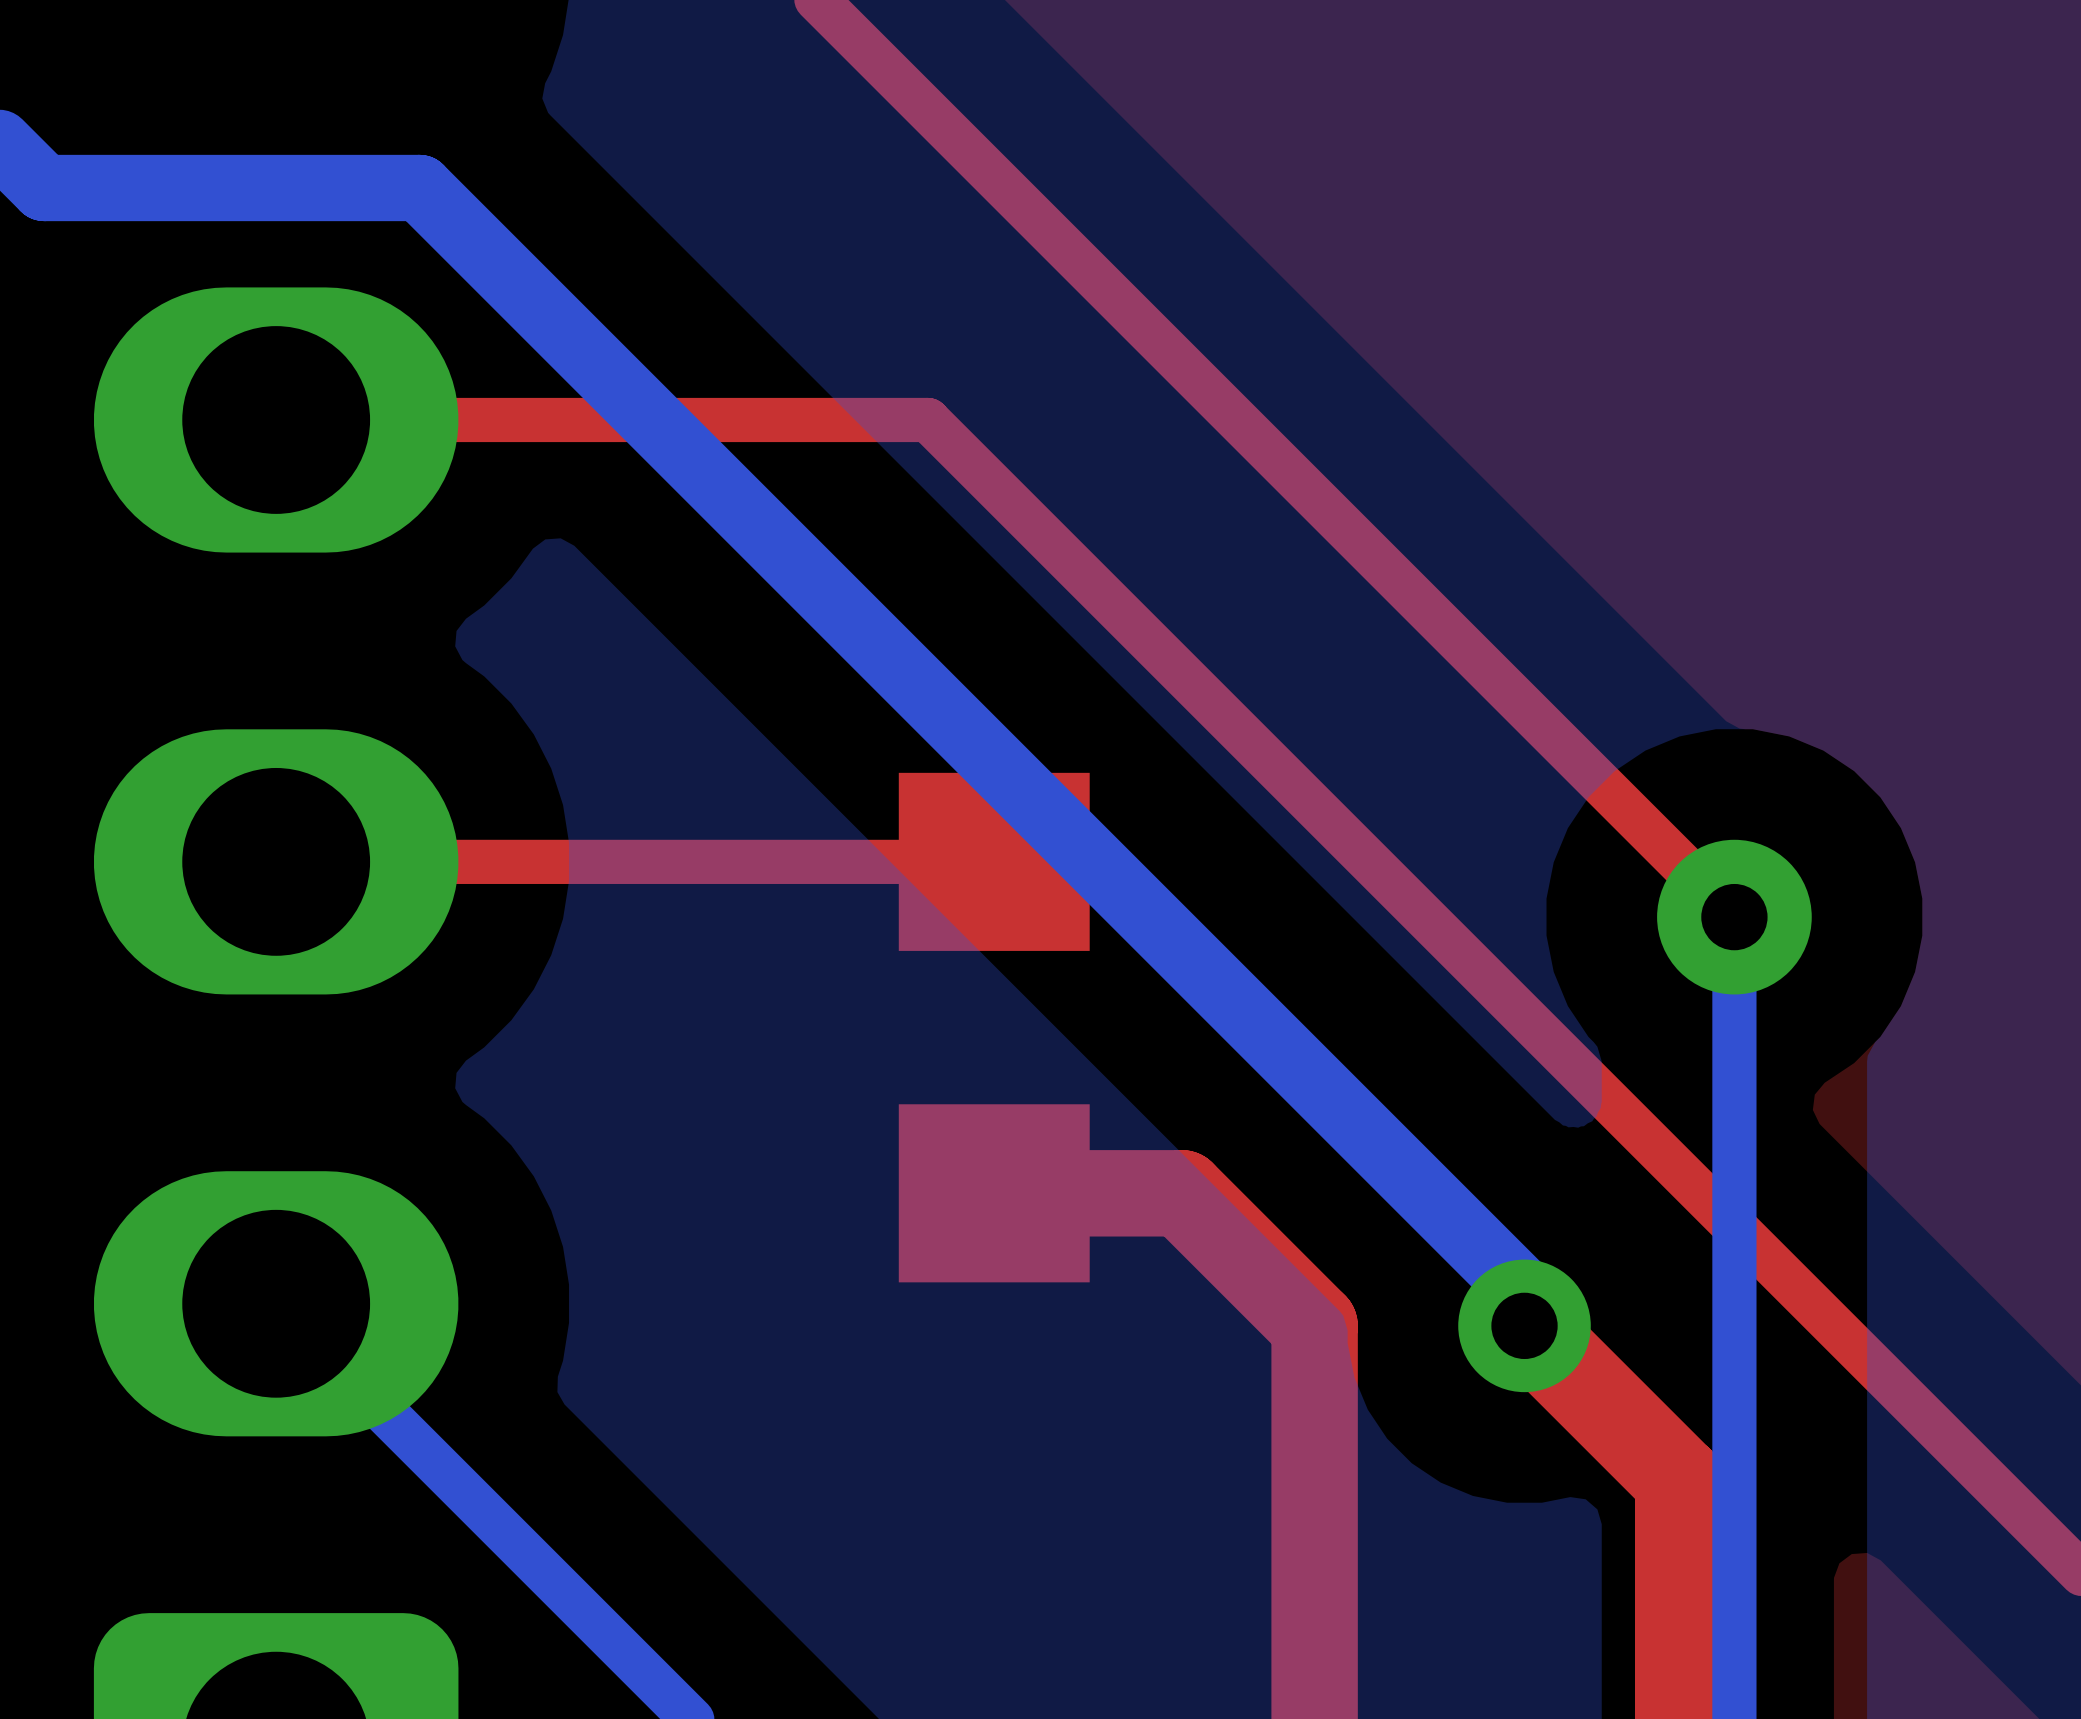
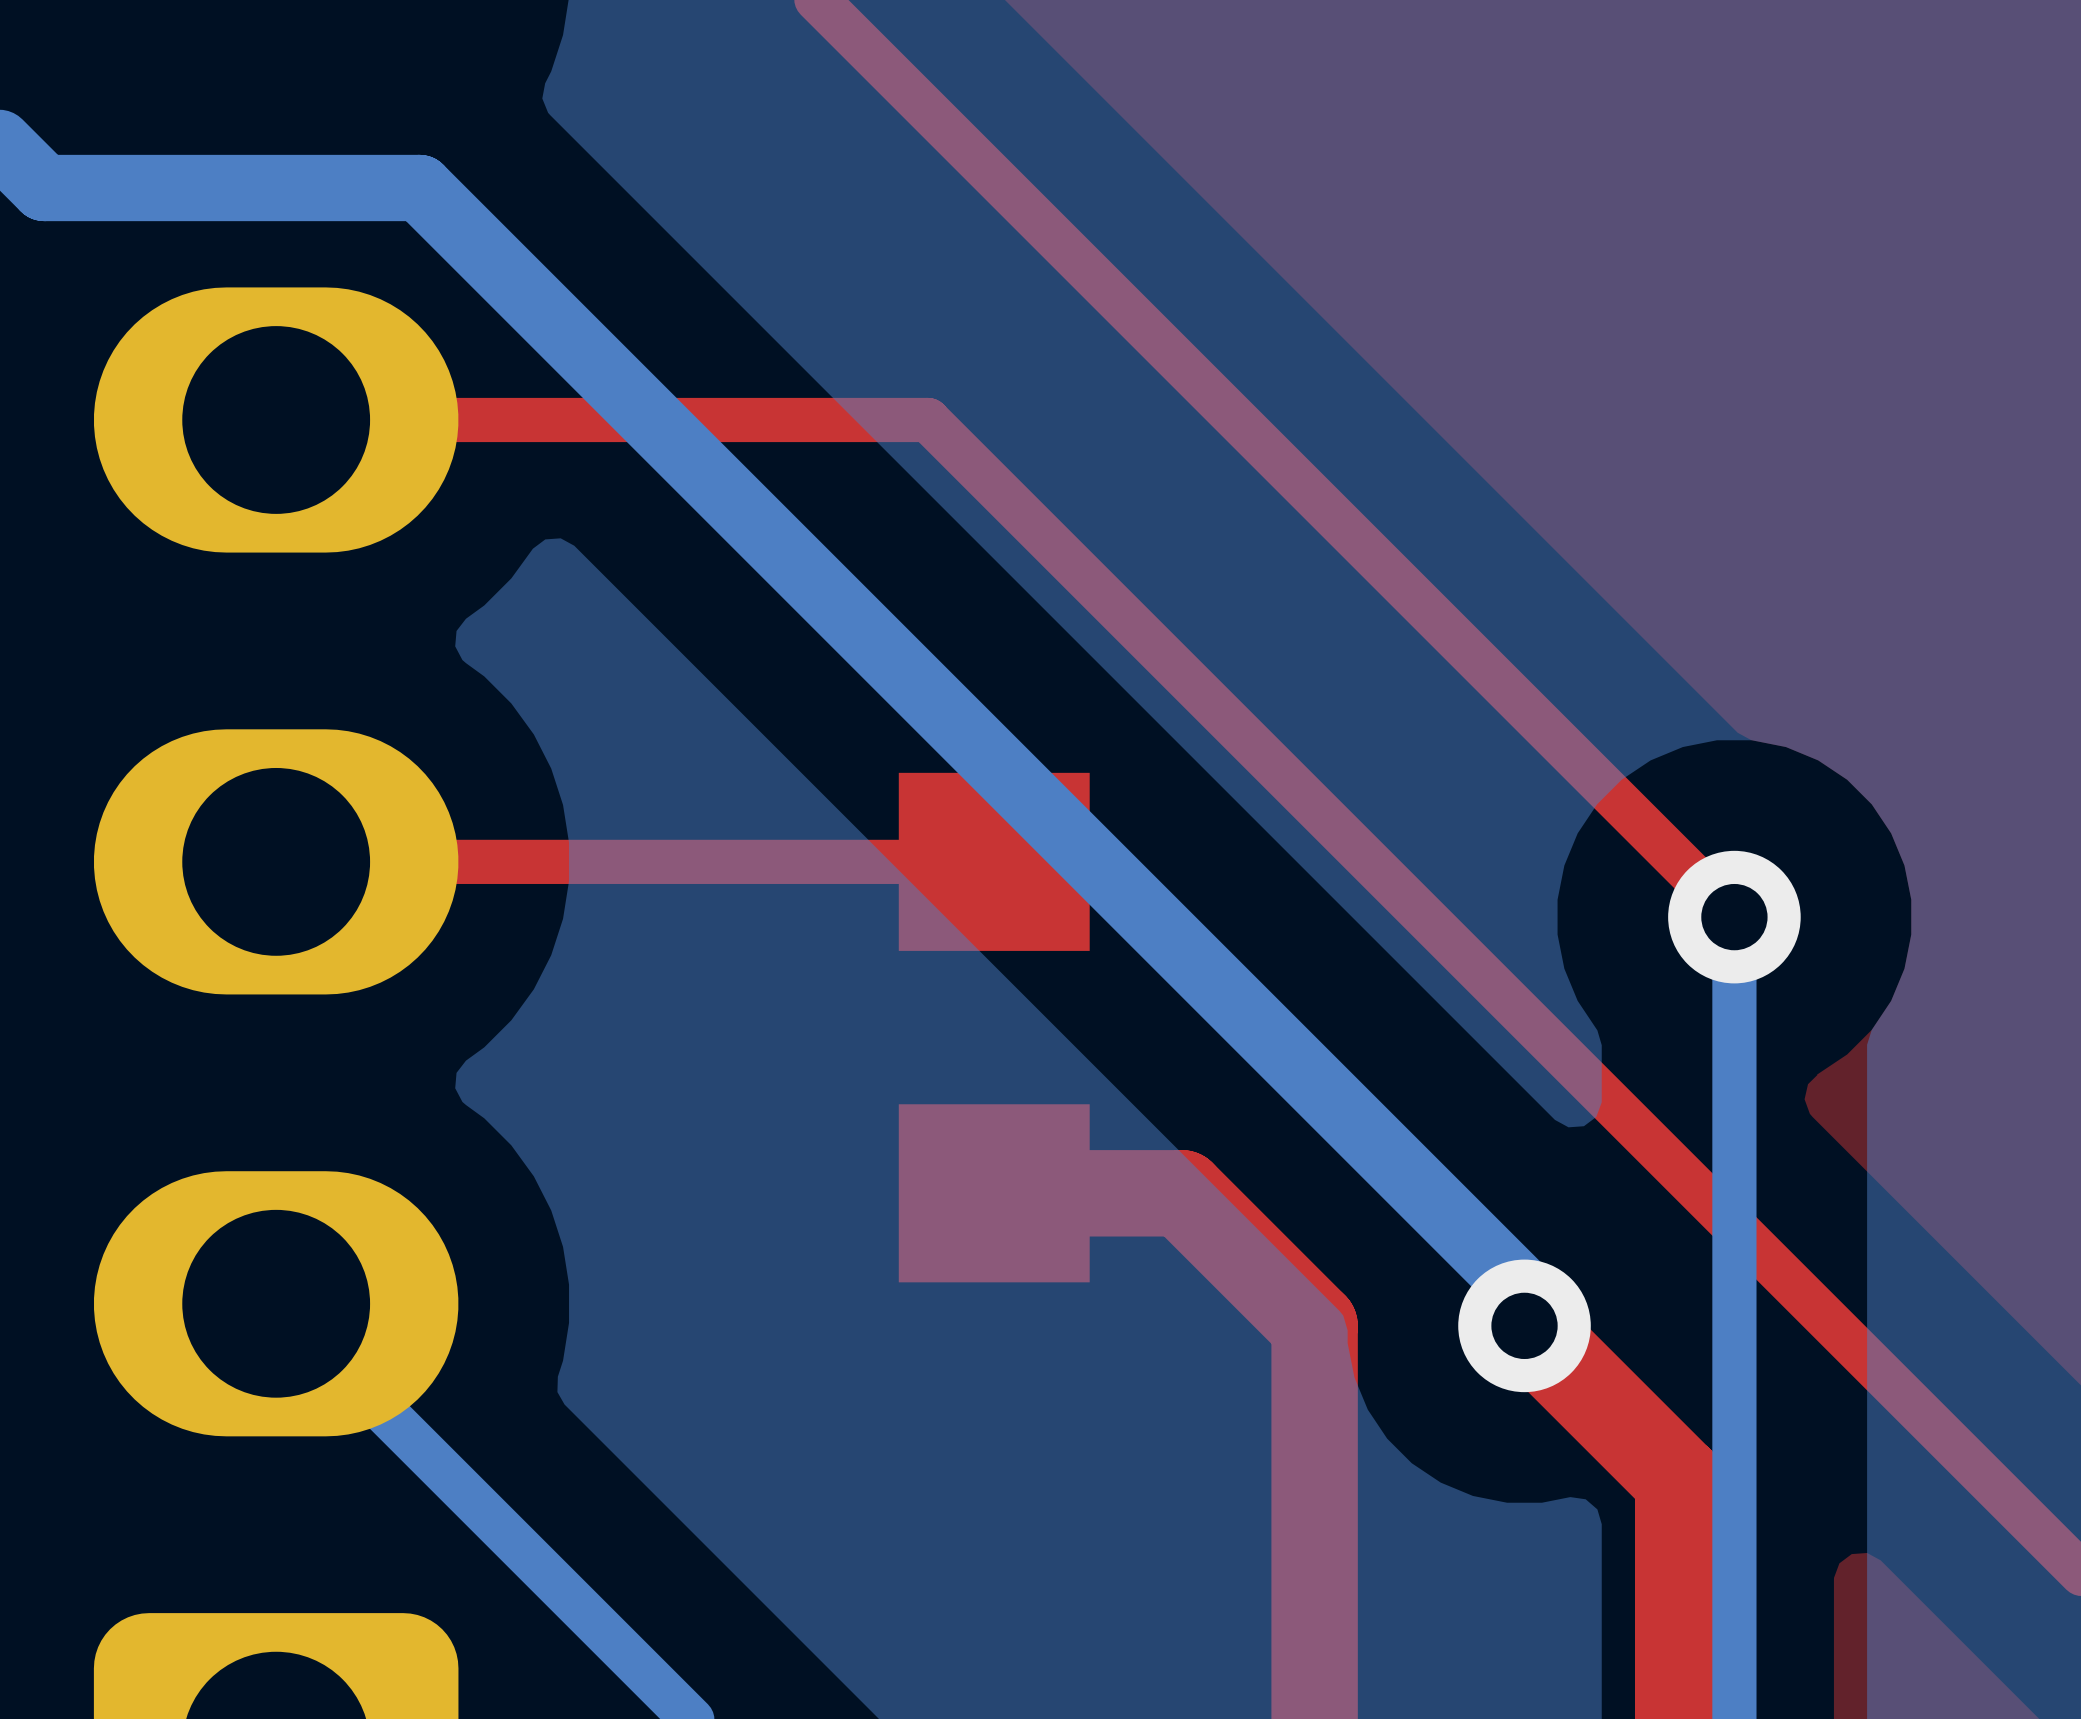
via size: [1657, 839, 1812, 995] -> [1668, 850, 1801, 984]

